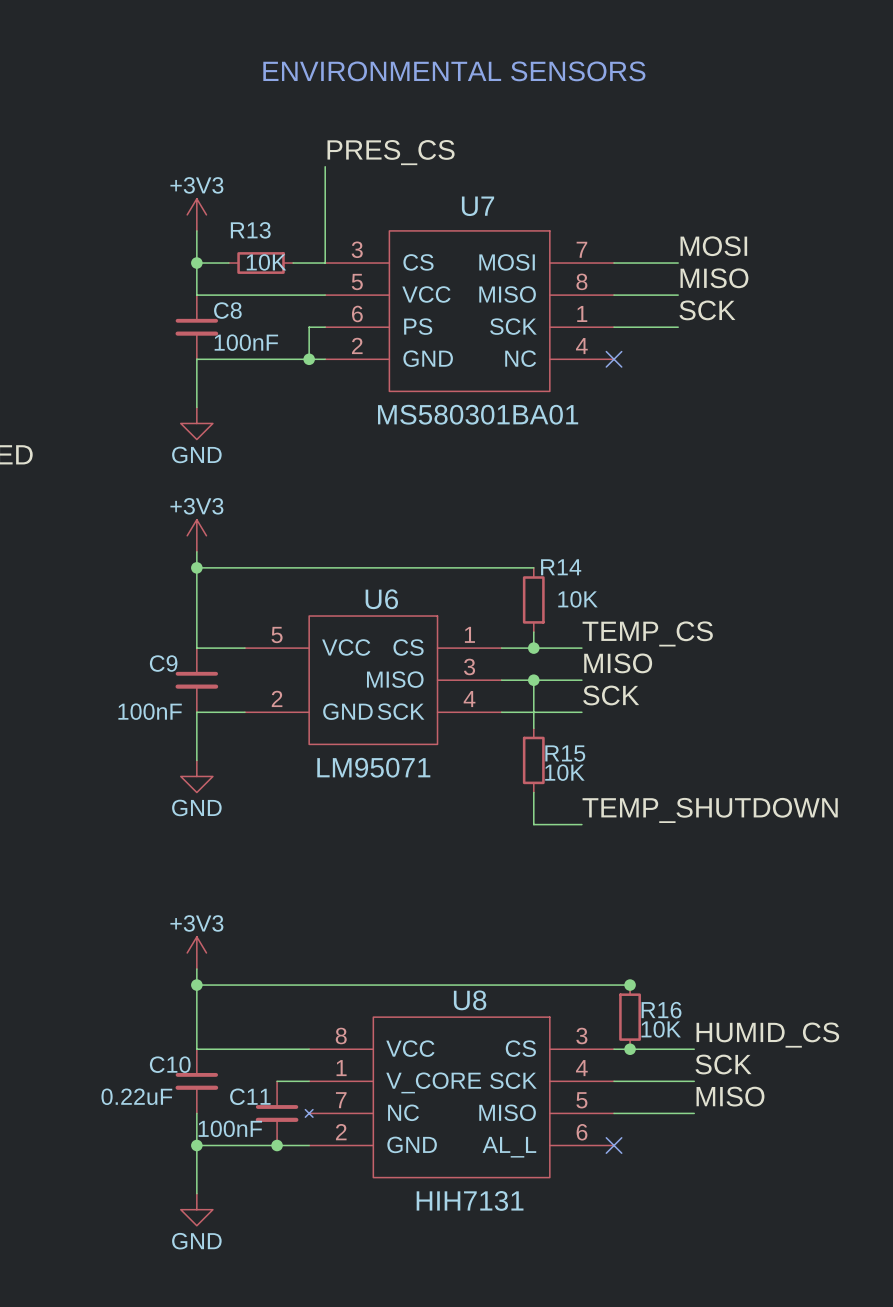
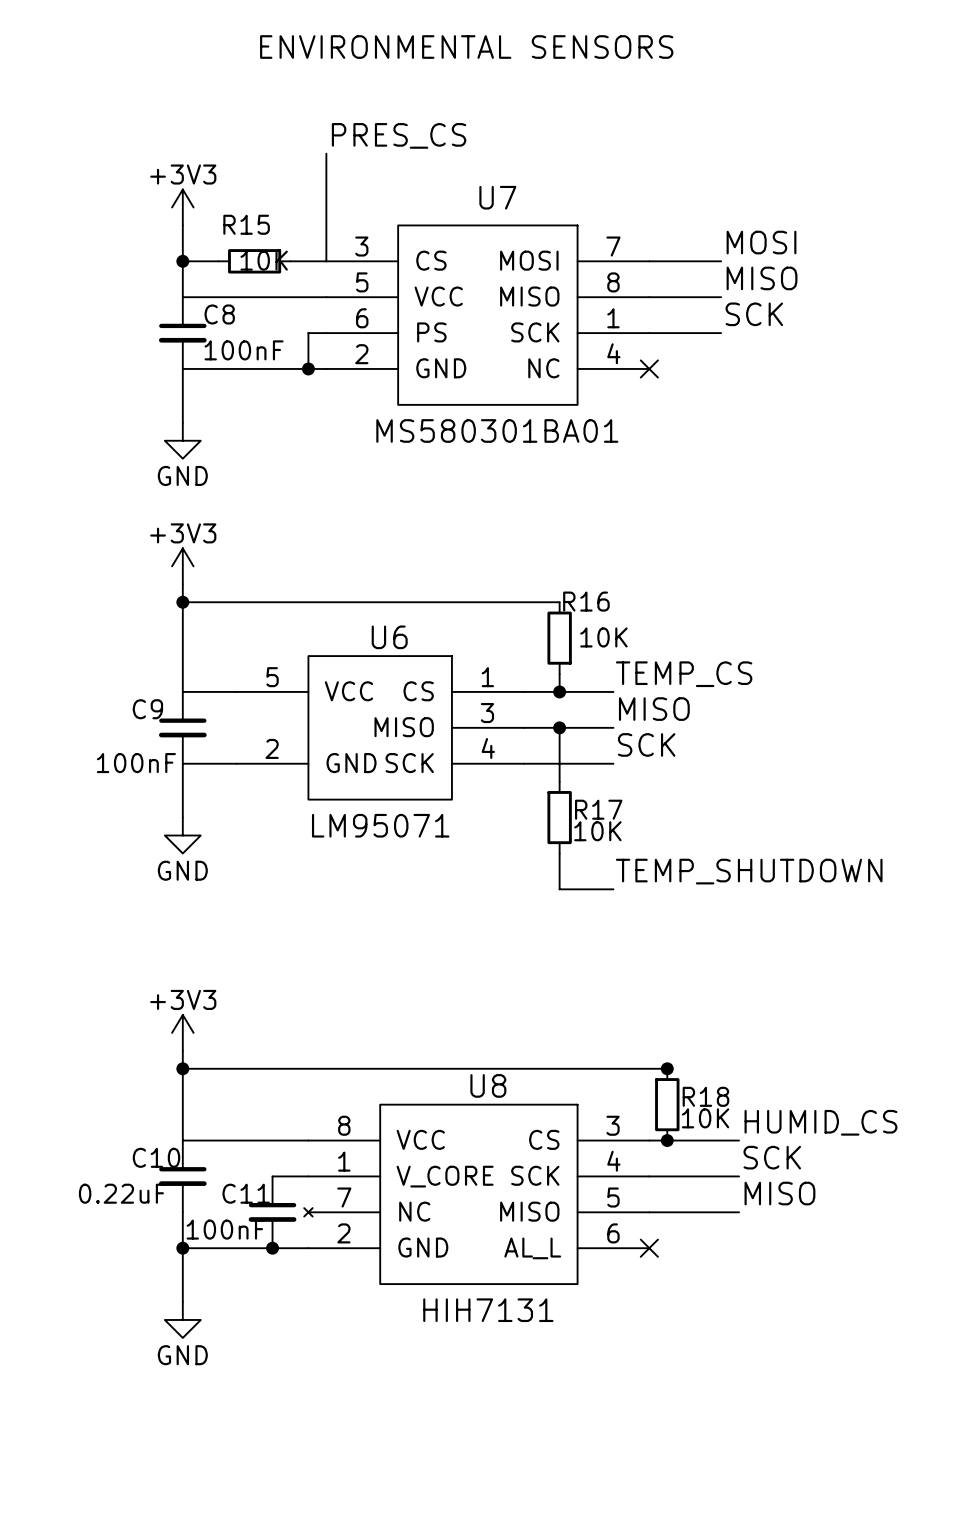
R13 name: R13 (250, 230) -> R15 (246, 224)
R14 name: R14 (561, 567) -> R16 (586, 601)
R15 name: R15 (565, 753) -> R17 (598, 809)
R16 name: R16 (661, 1010) -> R18 (705, 1096)

